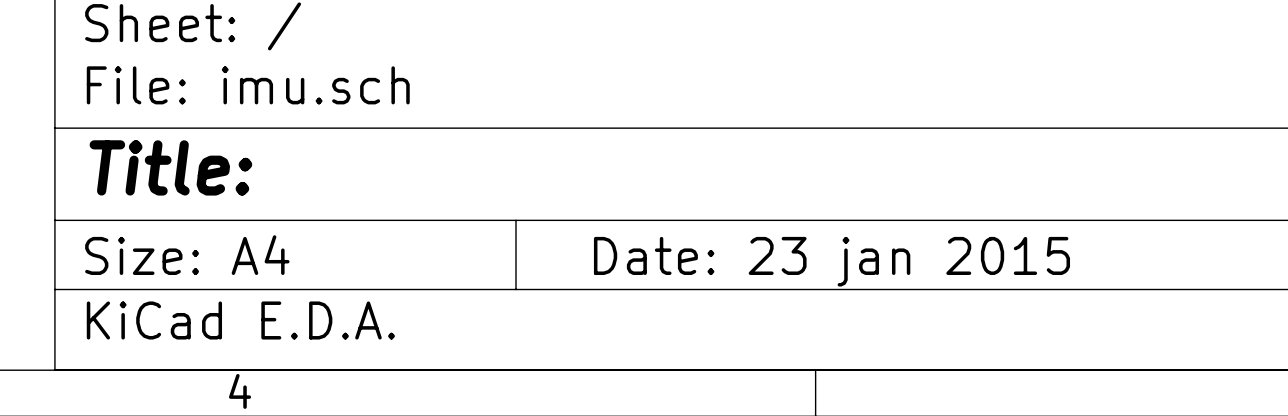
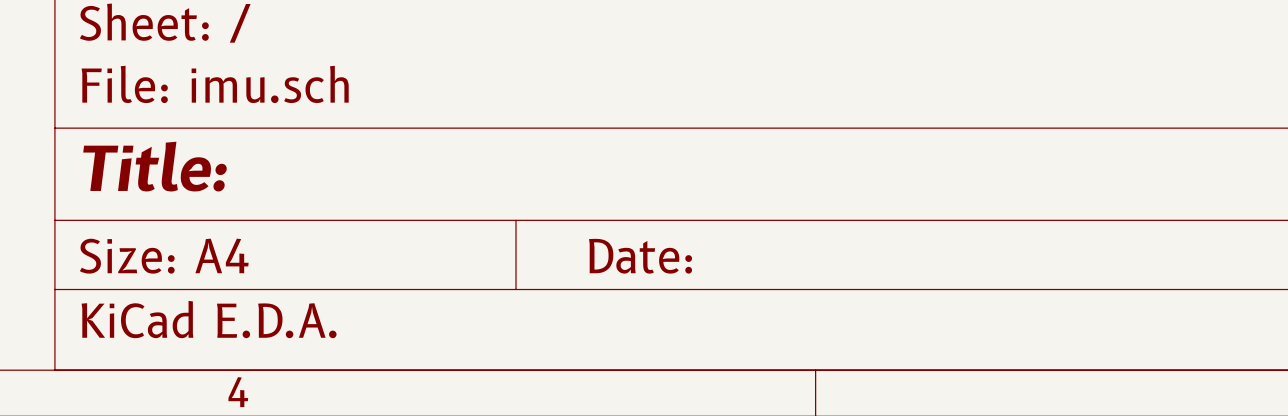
title block: Date: 23 jan 2015 (831, 261) -> Date: (640, 256)

